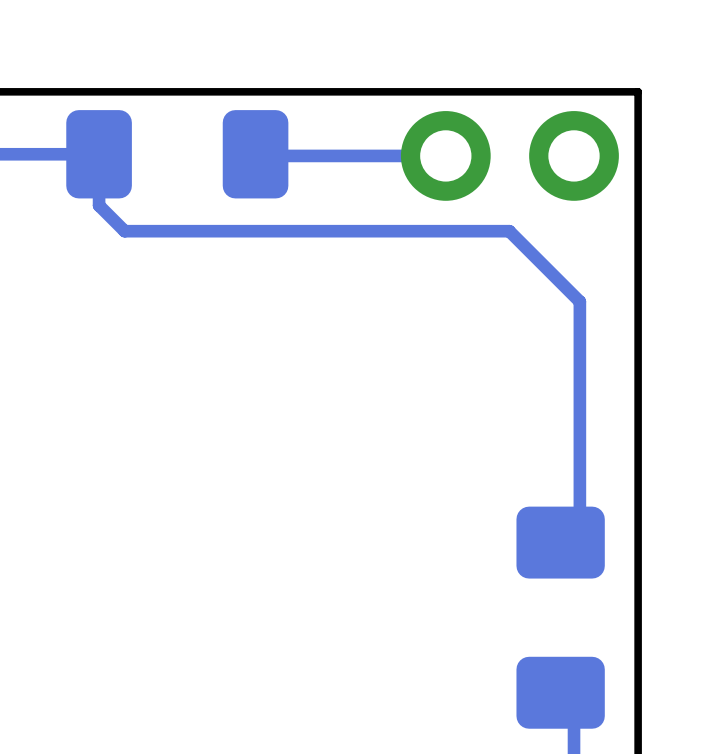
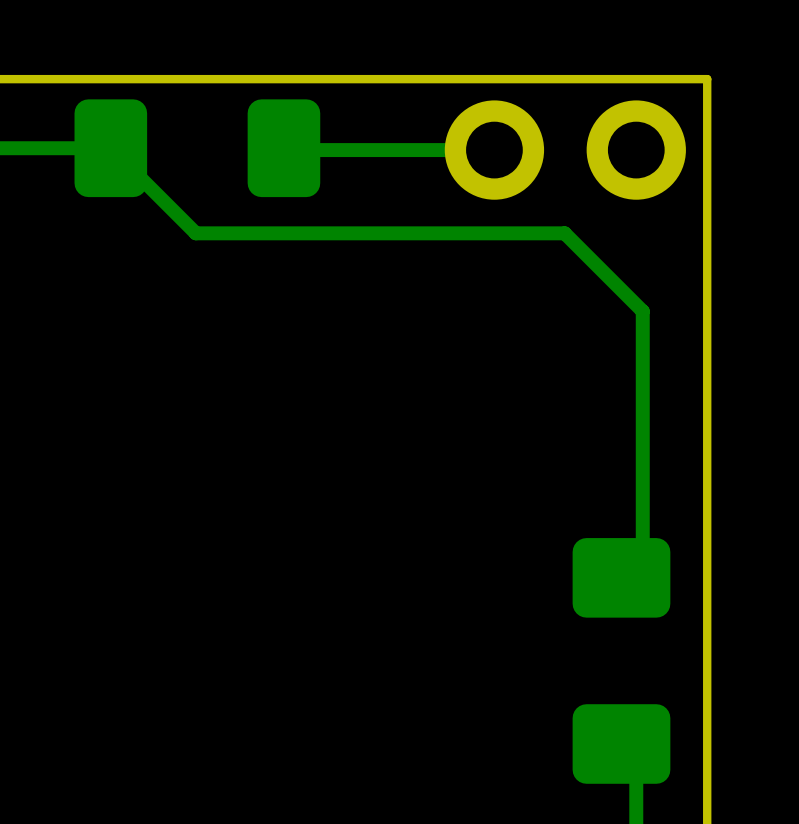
bottom track: (99, 154) (99, 205) (124, 231) (176, 231) -> (110, 148) (195, 233)

